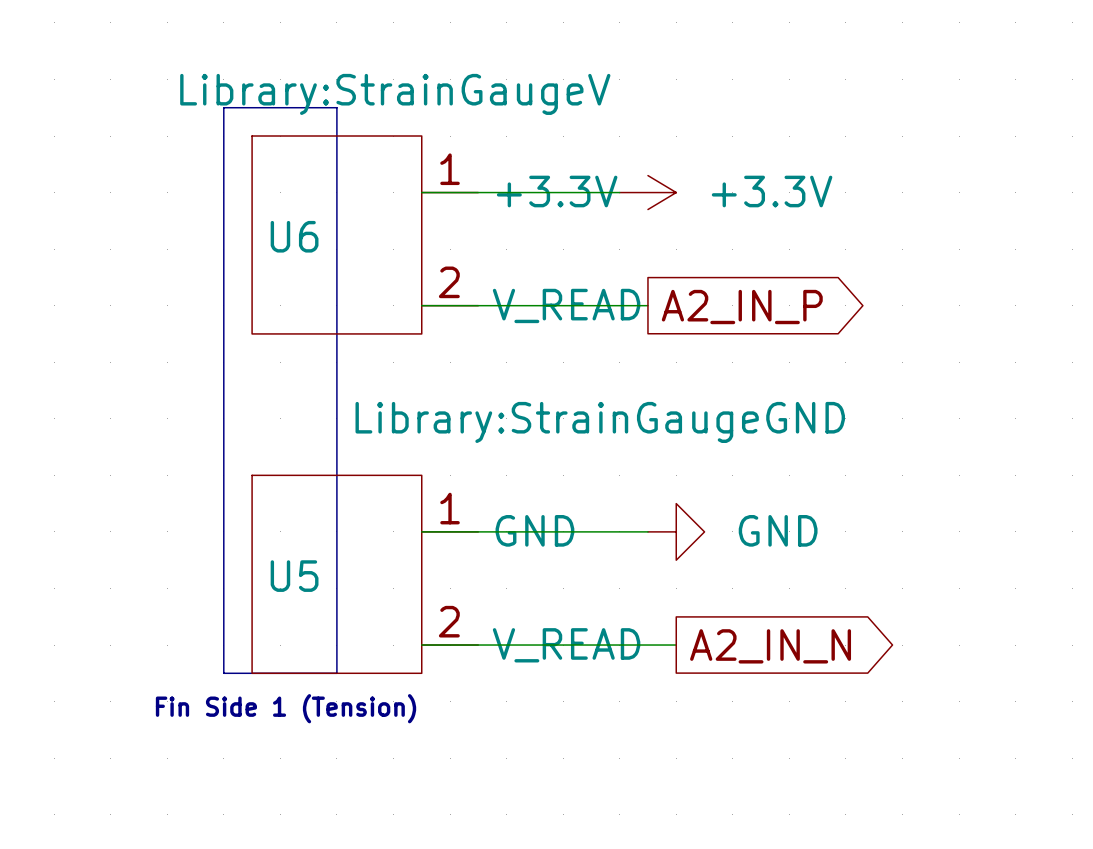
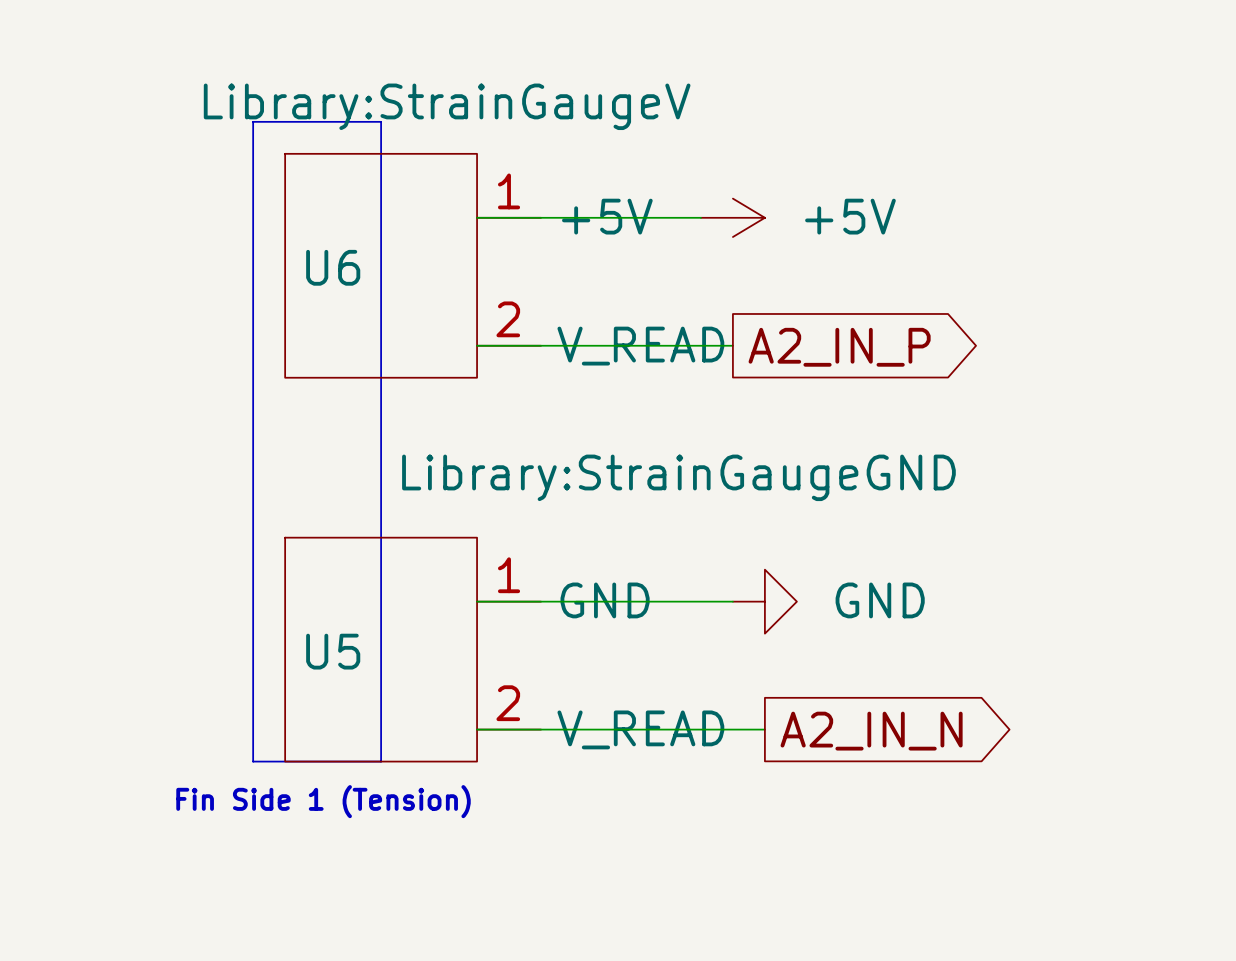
U6 pin name: +3.3V (557, 191) -> +5V (607, 216)
power symbol: +3.3V (647, 192) -> +5V (732, 217)

